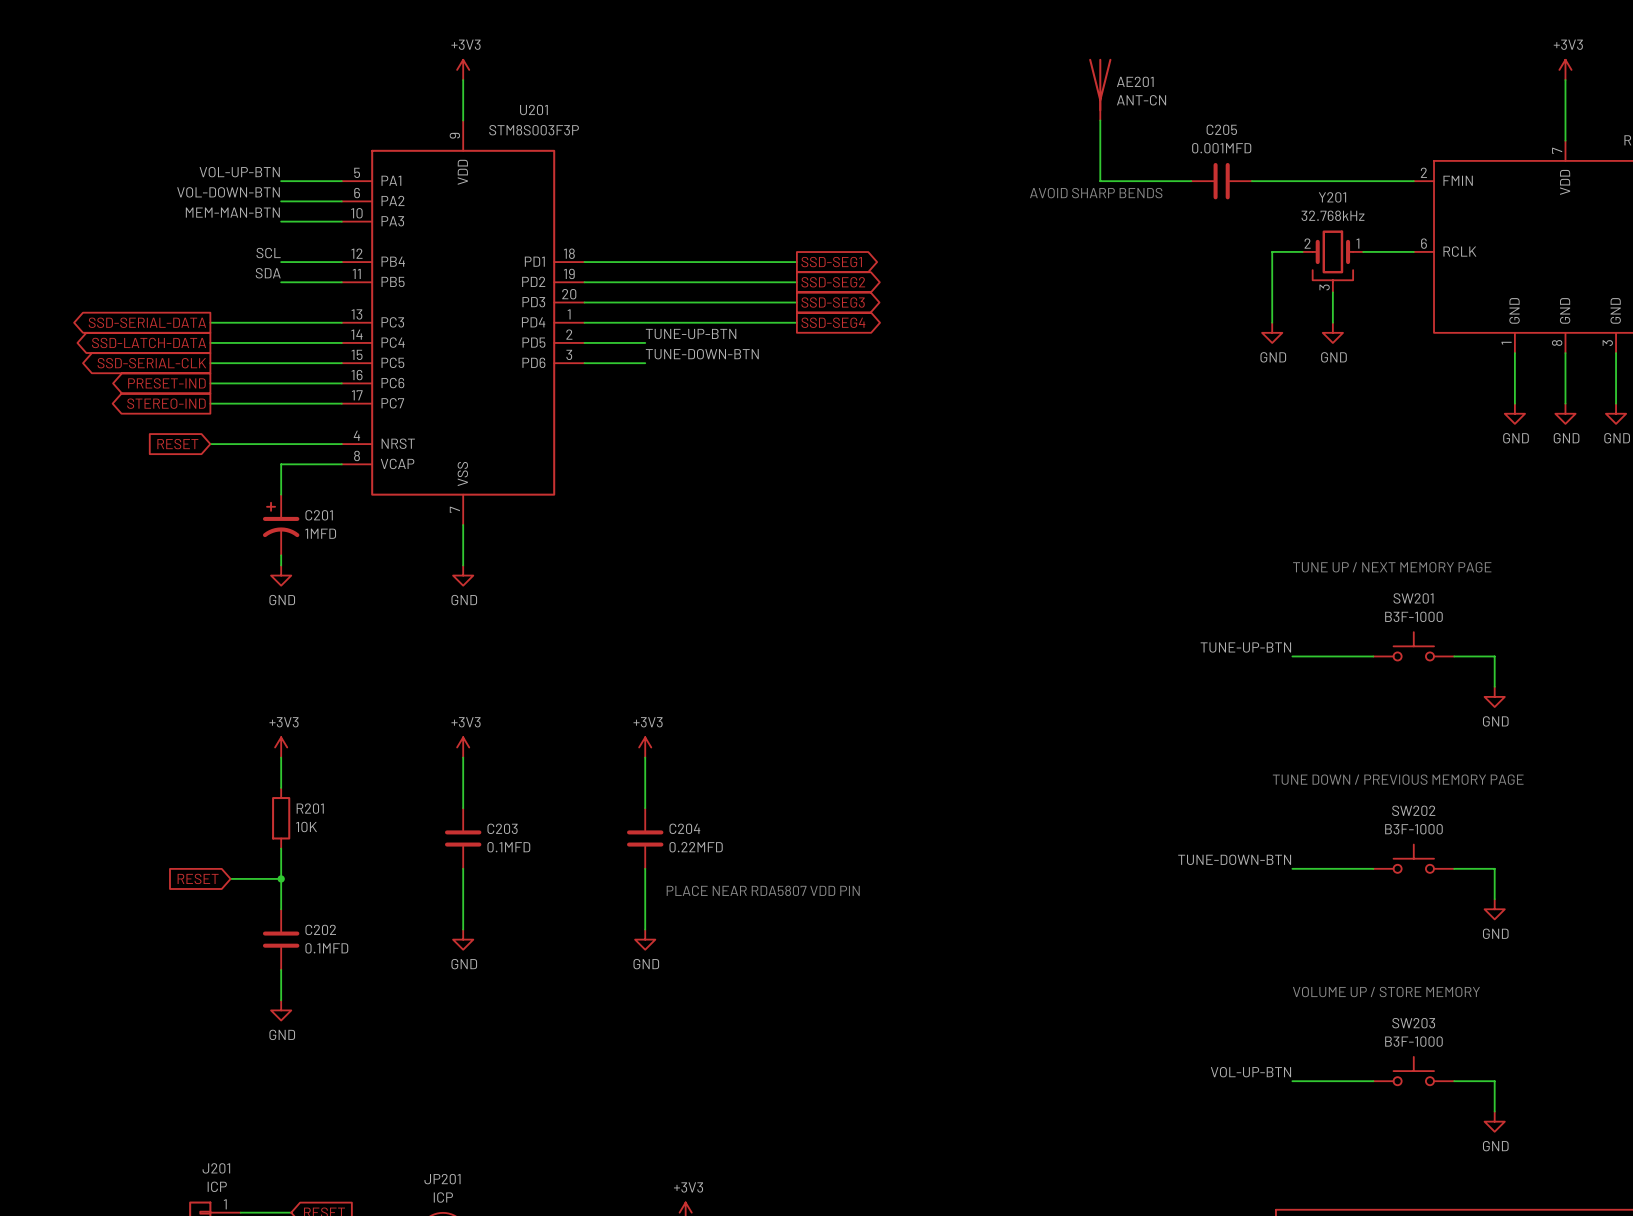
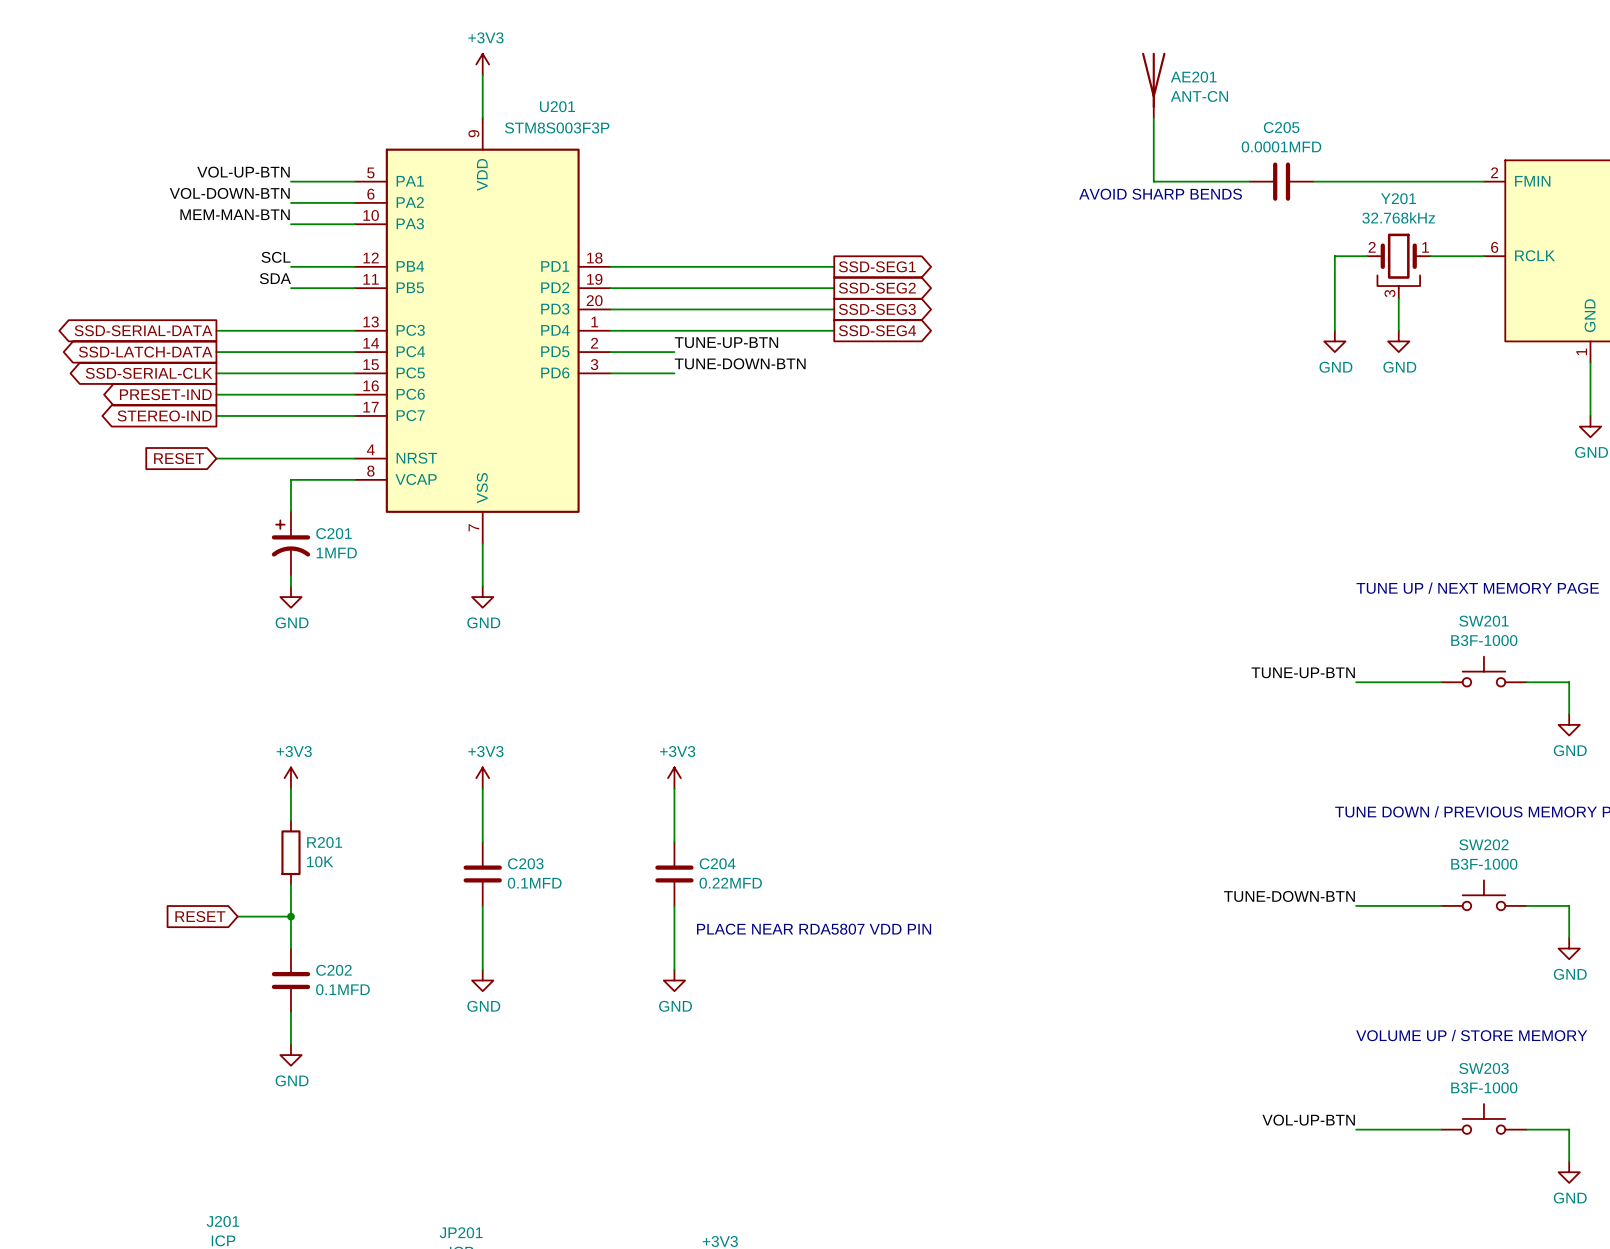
C205 value: 0.001MFD (1221, 148) -> 0.0001MFD (1281, 146)

